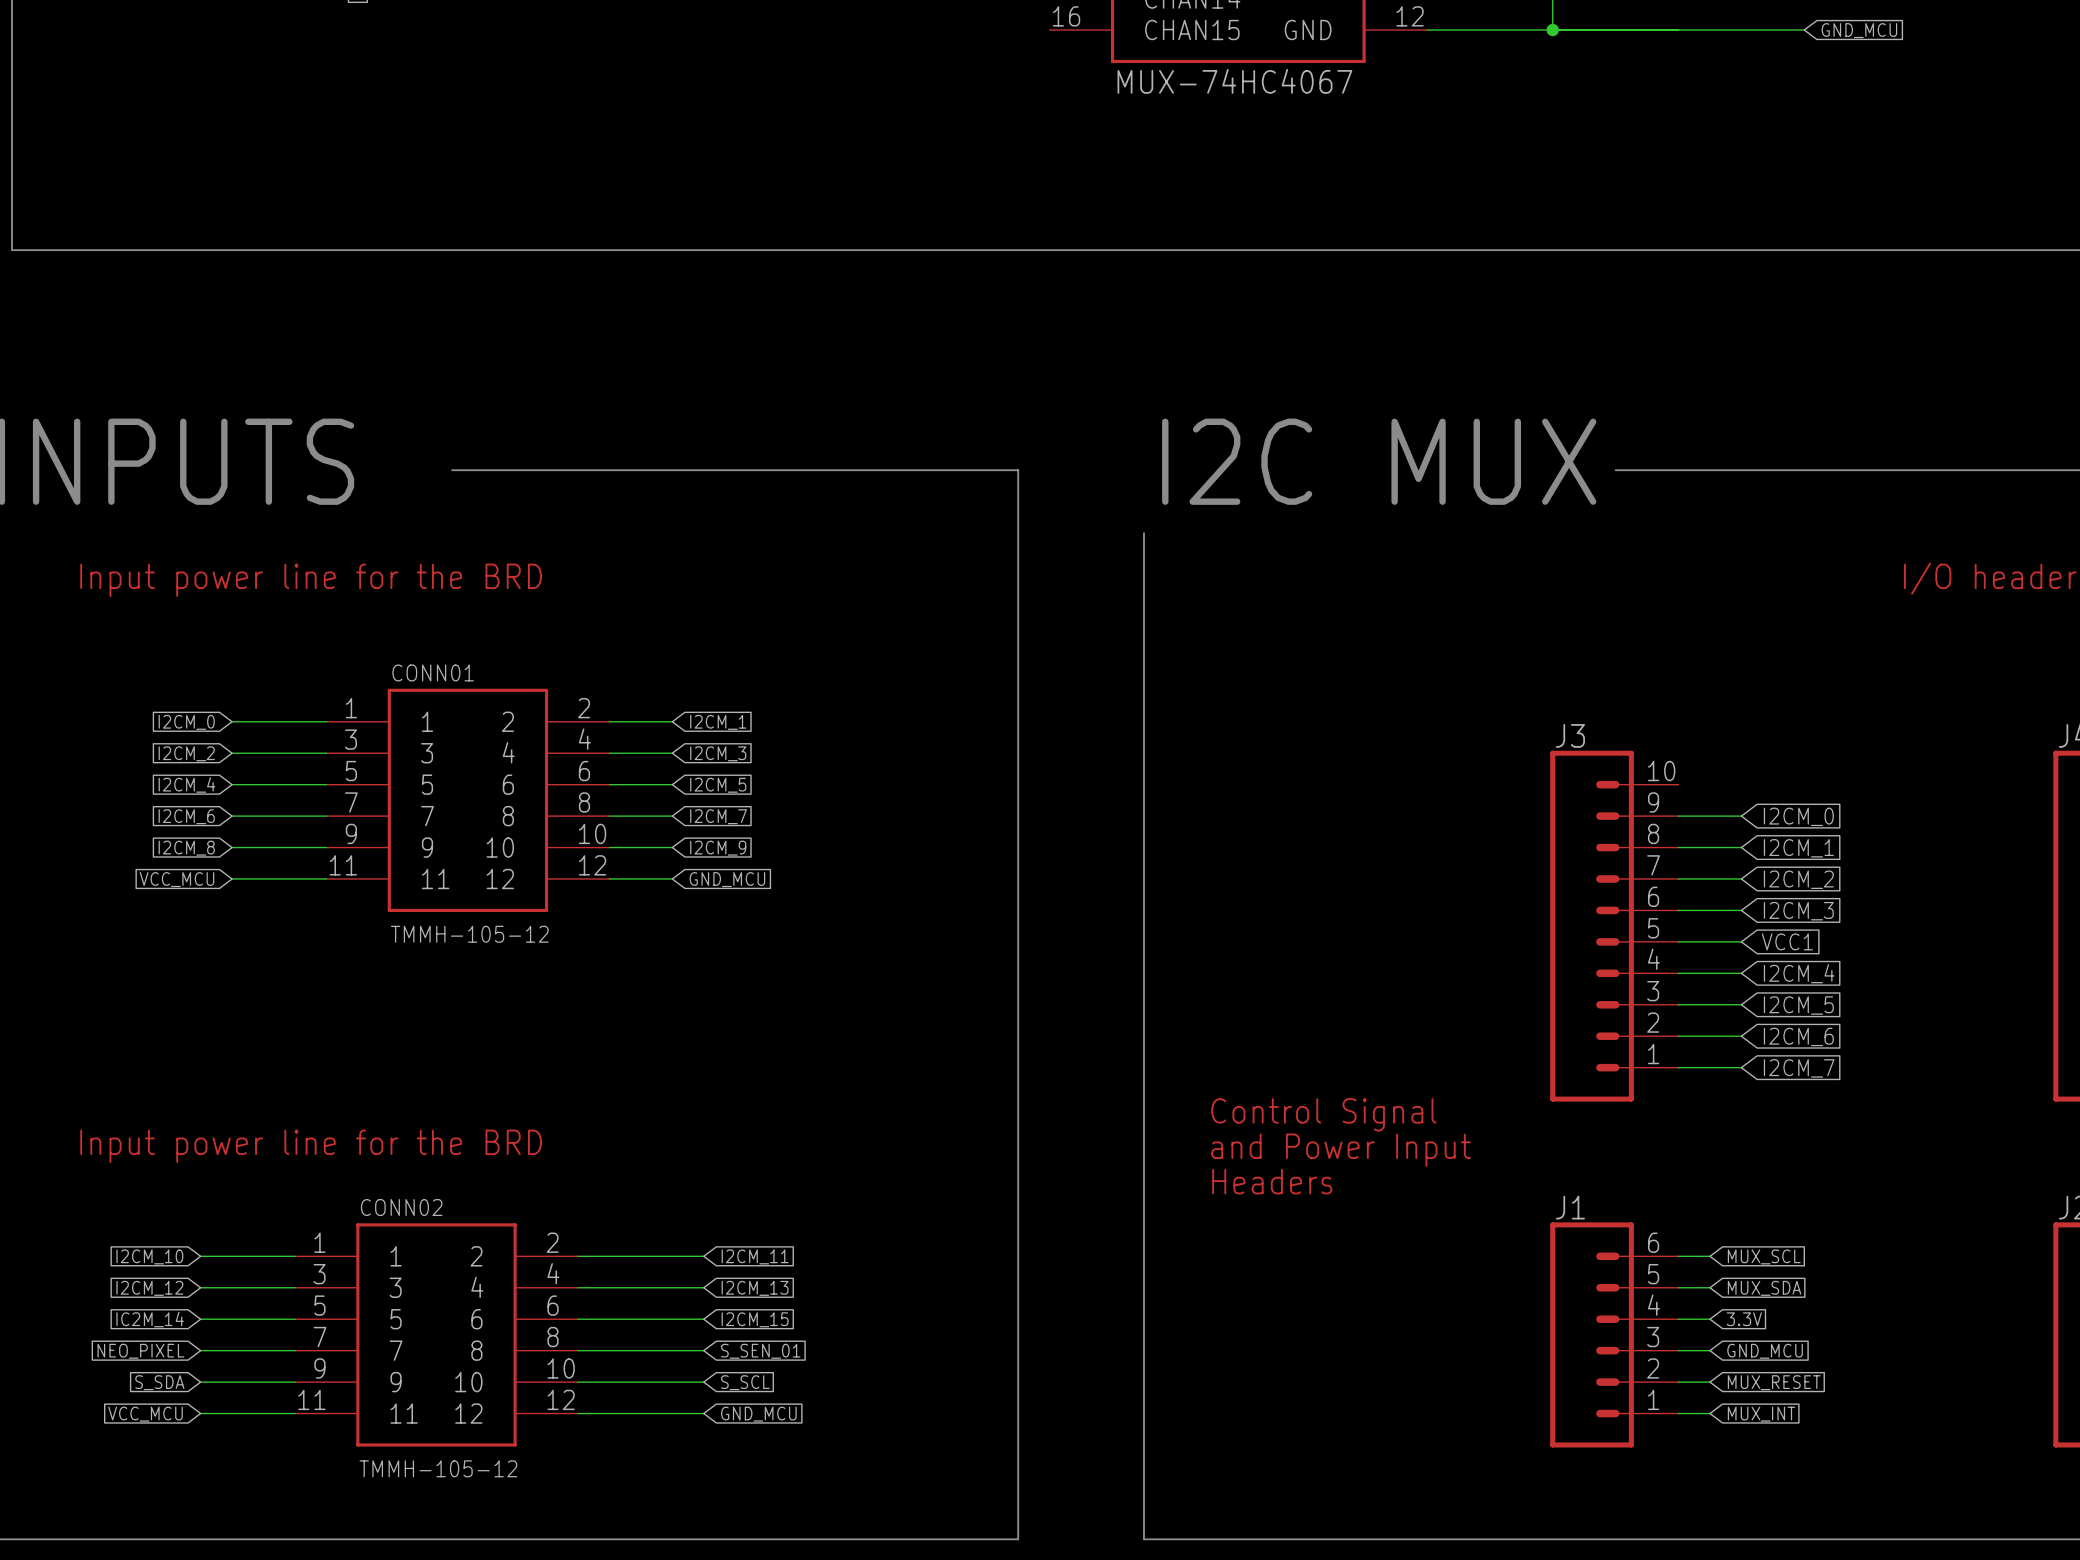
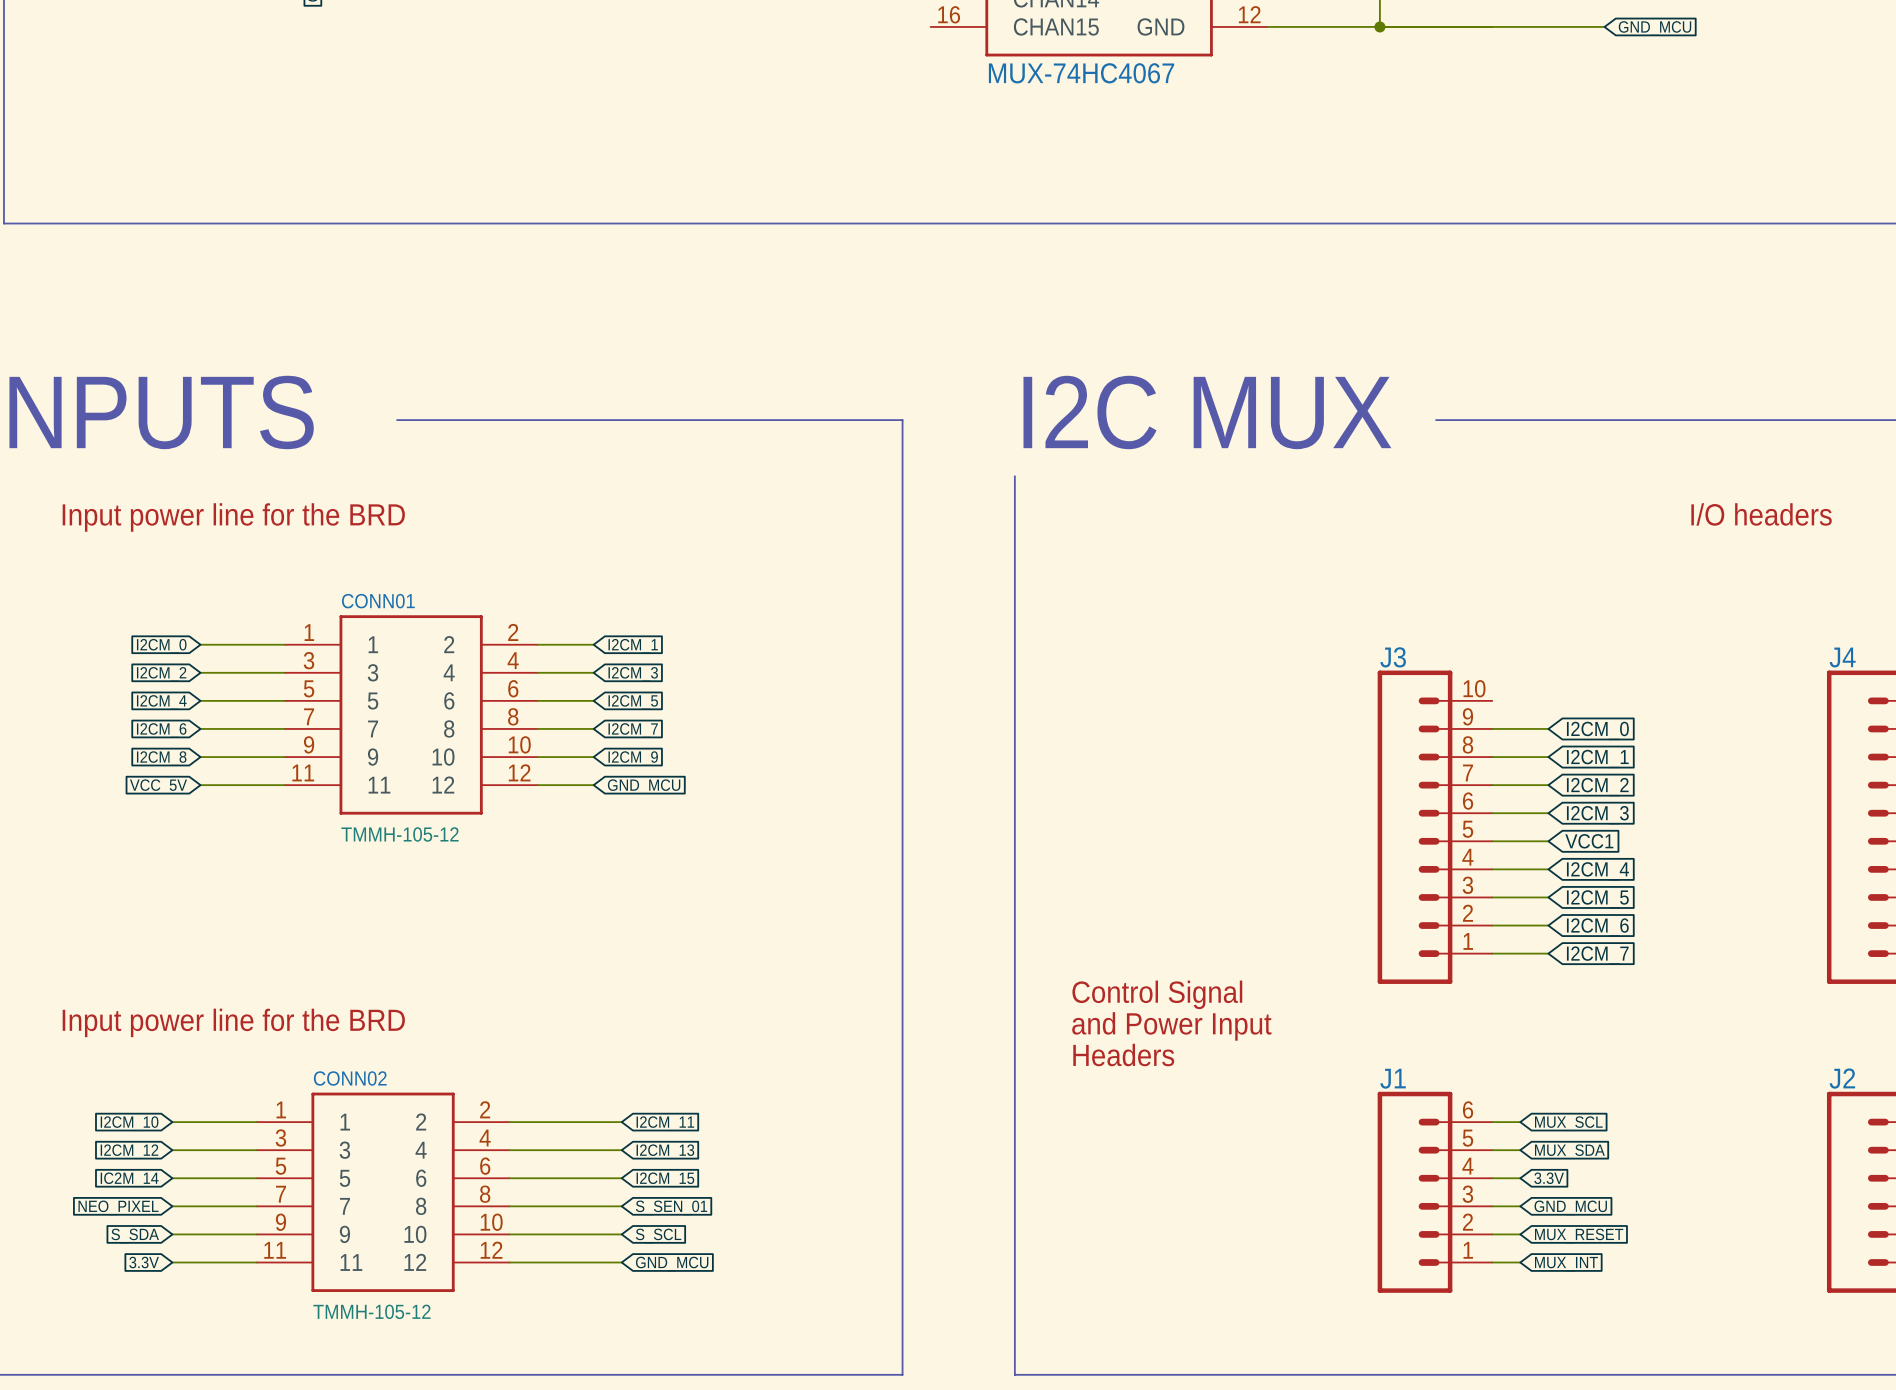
global label: VCC_MCU (176, 879) -> VCC_5V (158, 786)
global label: VCC_MCU (145, 1414) -> 3.3V (144, 1262)

